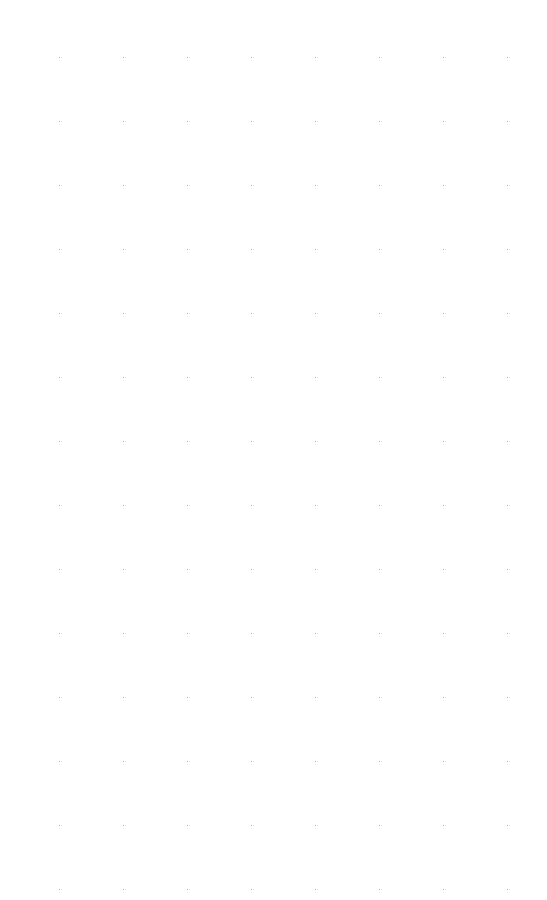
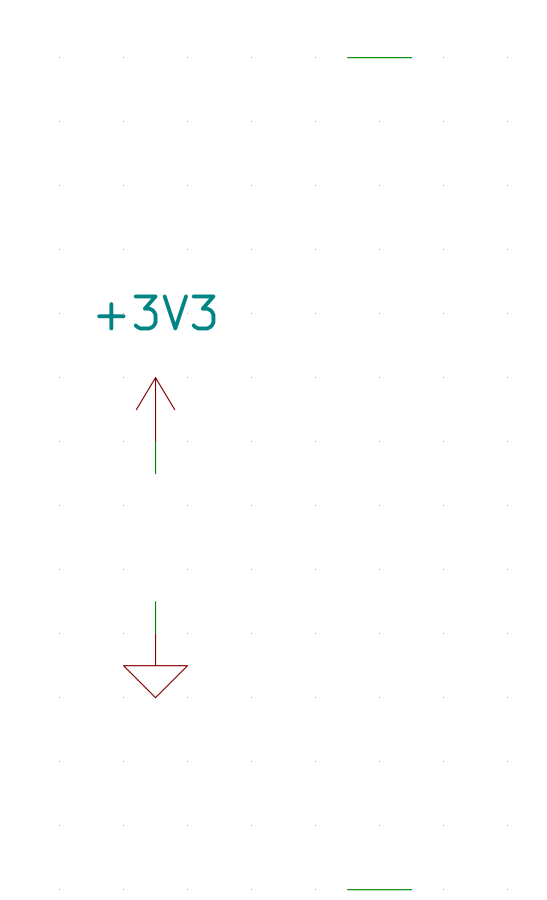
wire: none -> (347, 57) (411, 57)
power symbol: none -> +3V3 (155, 409)
wire: none -> (155, 441) (155, 473)
wire: none -> (155, 601) (155, 633)
power symbol: none -> (155, 665)
wire: none -> (347, 889) (411, 889)

